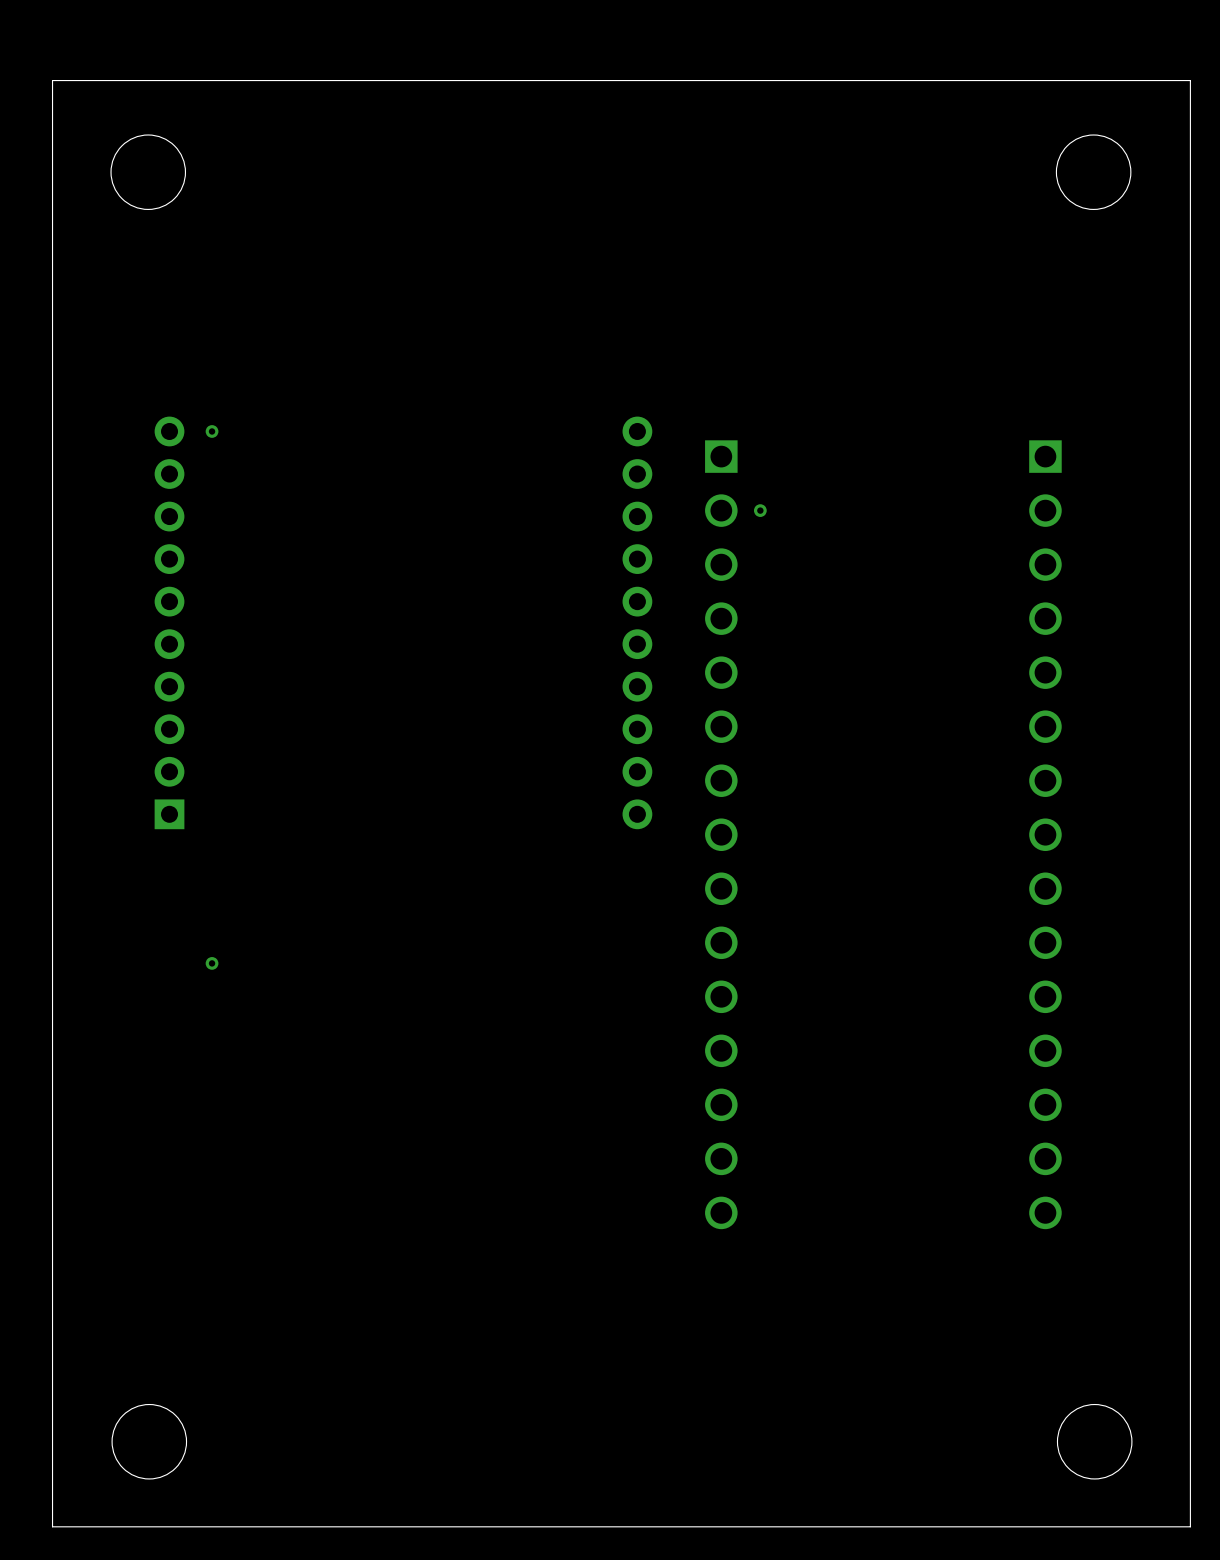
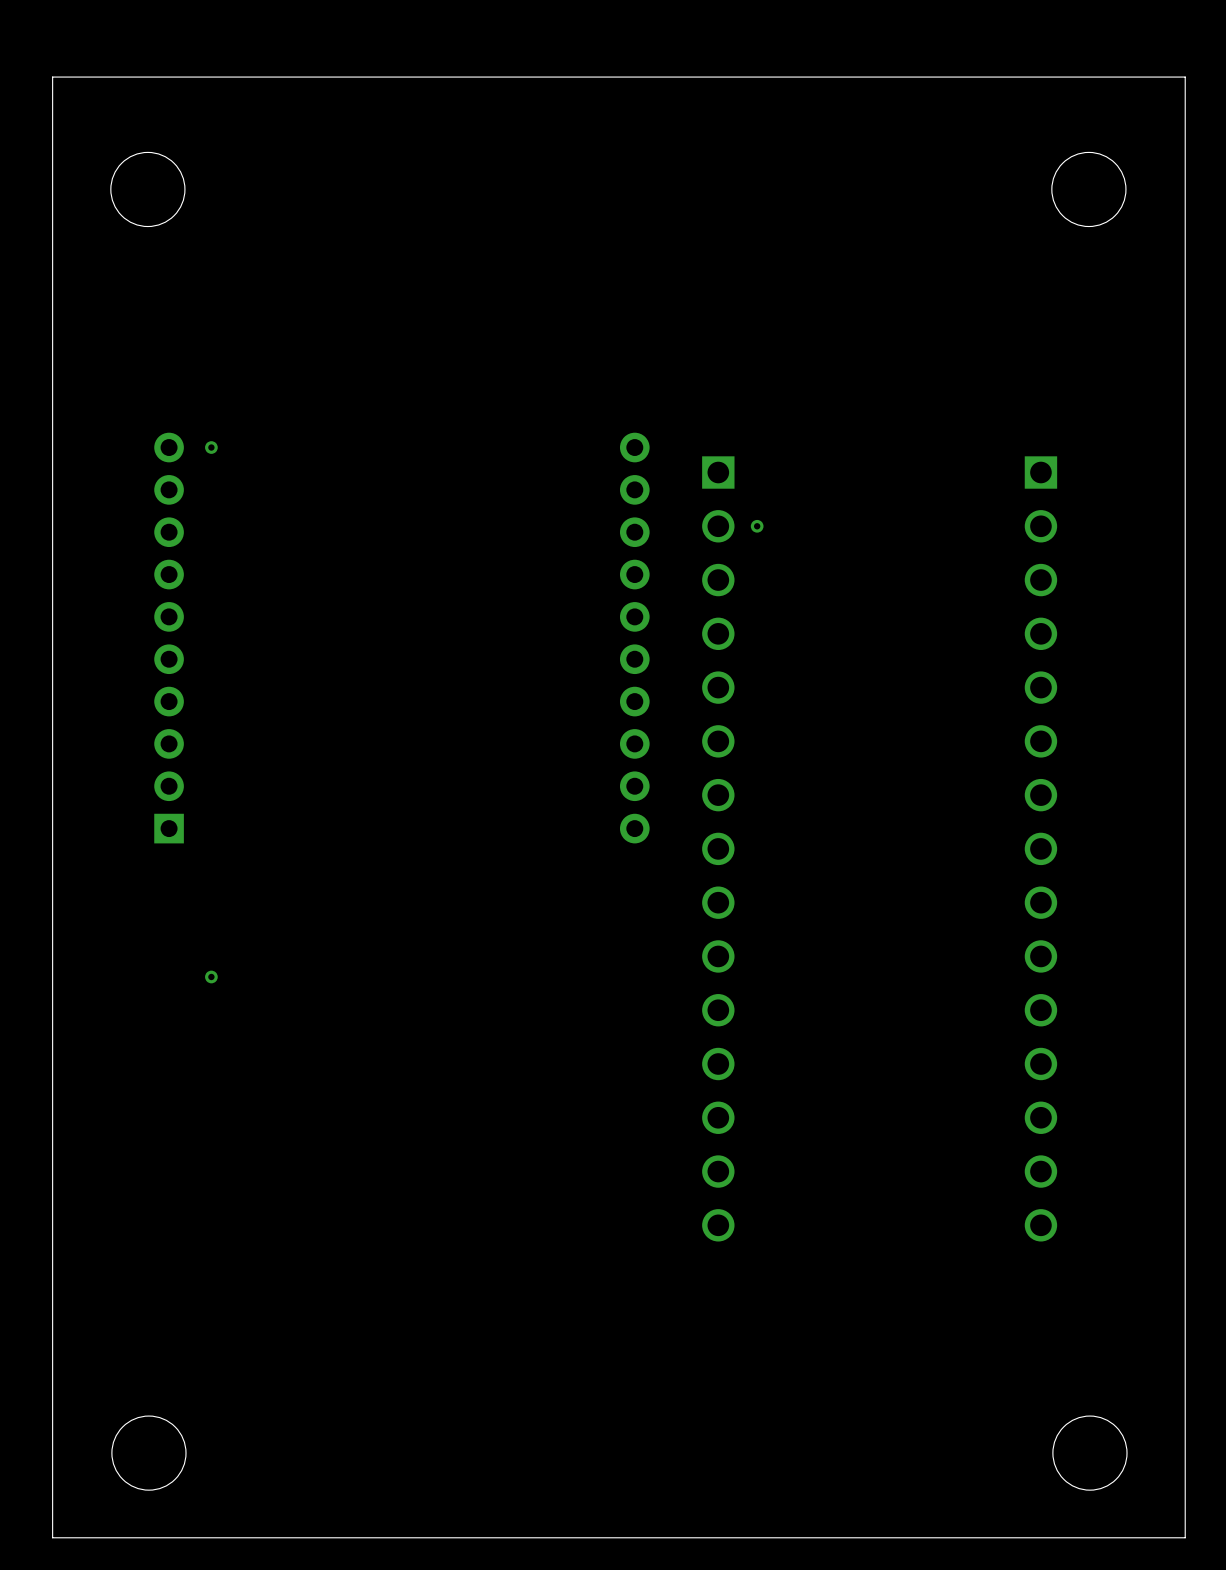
board edge: (1190, 80) (52, 80) -> (1185, 98) (1185, 77) (52, 77) (52, 98)

